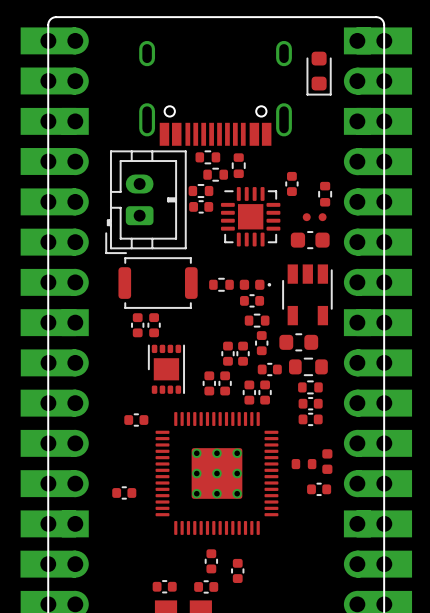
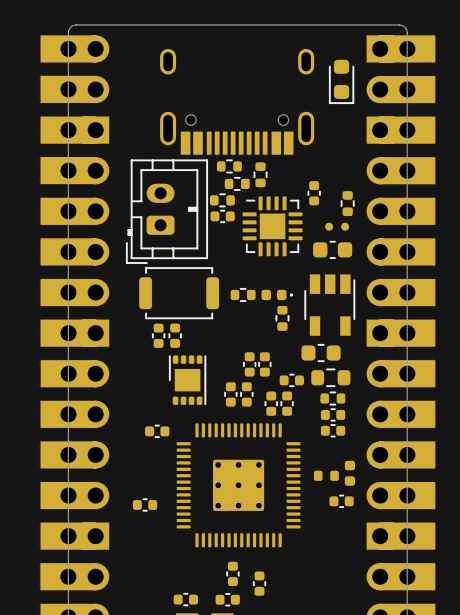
part: (252, 300) -> none
part rotation: 0° (257, 320) -> 90° clockwise (282, 318)
part: (261, 343) -> none

